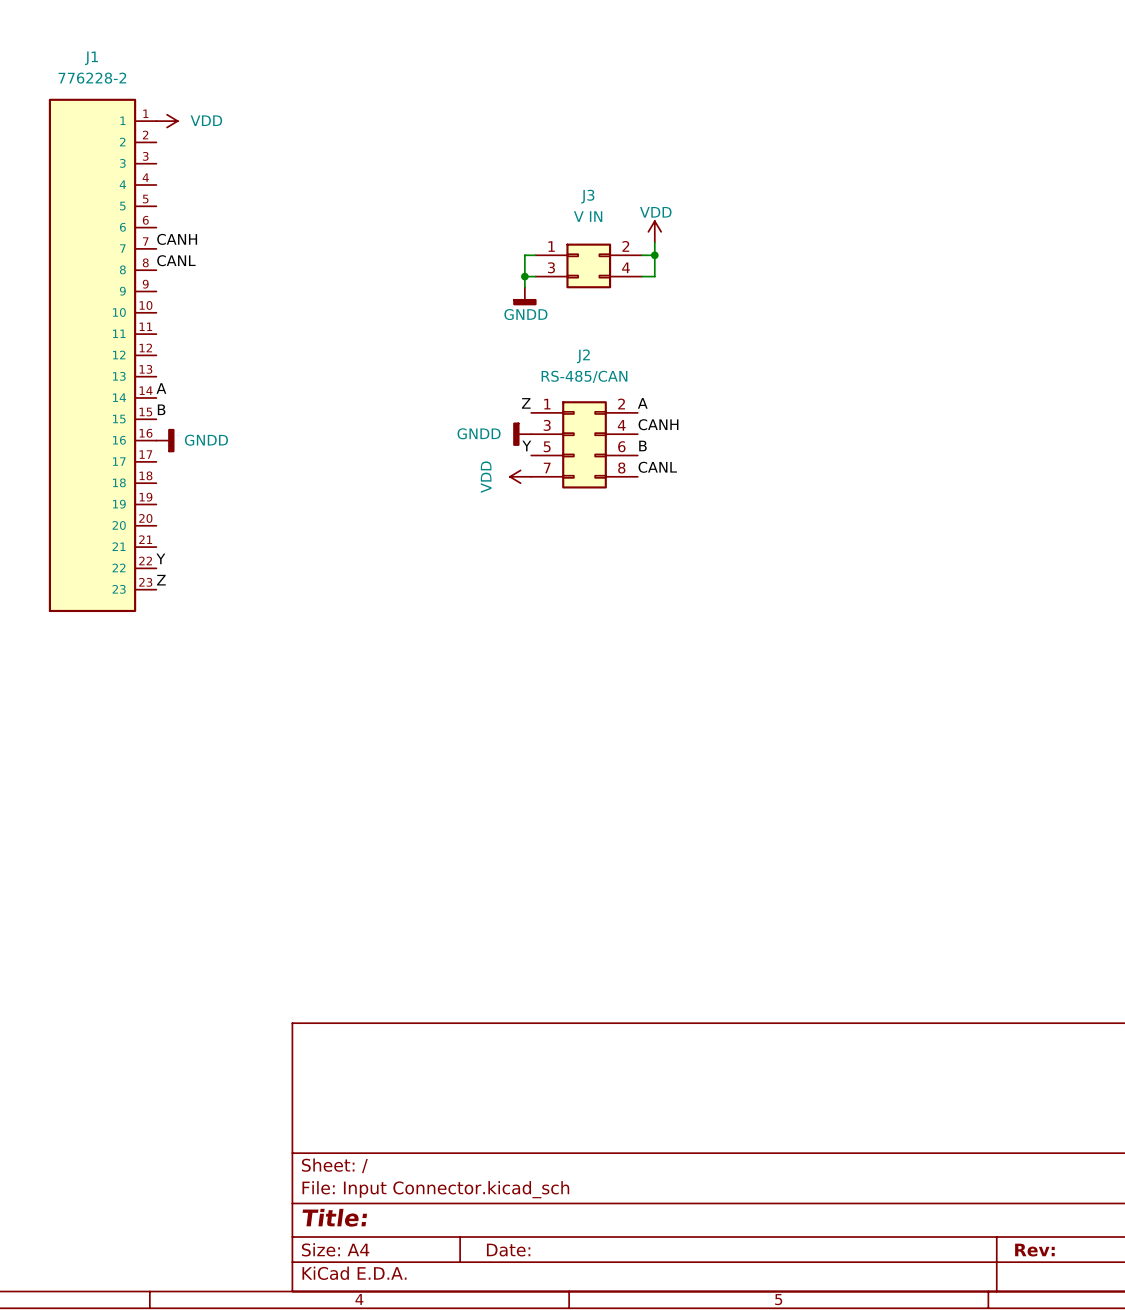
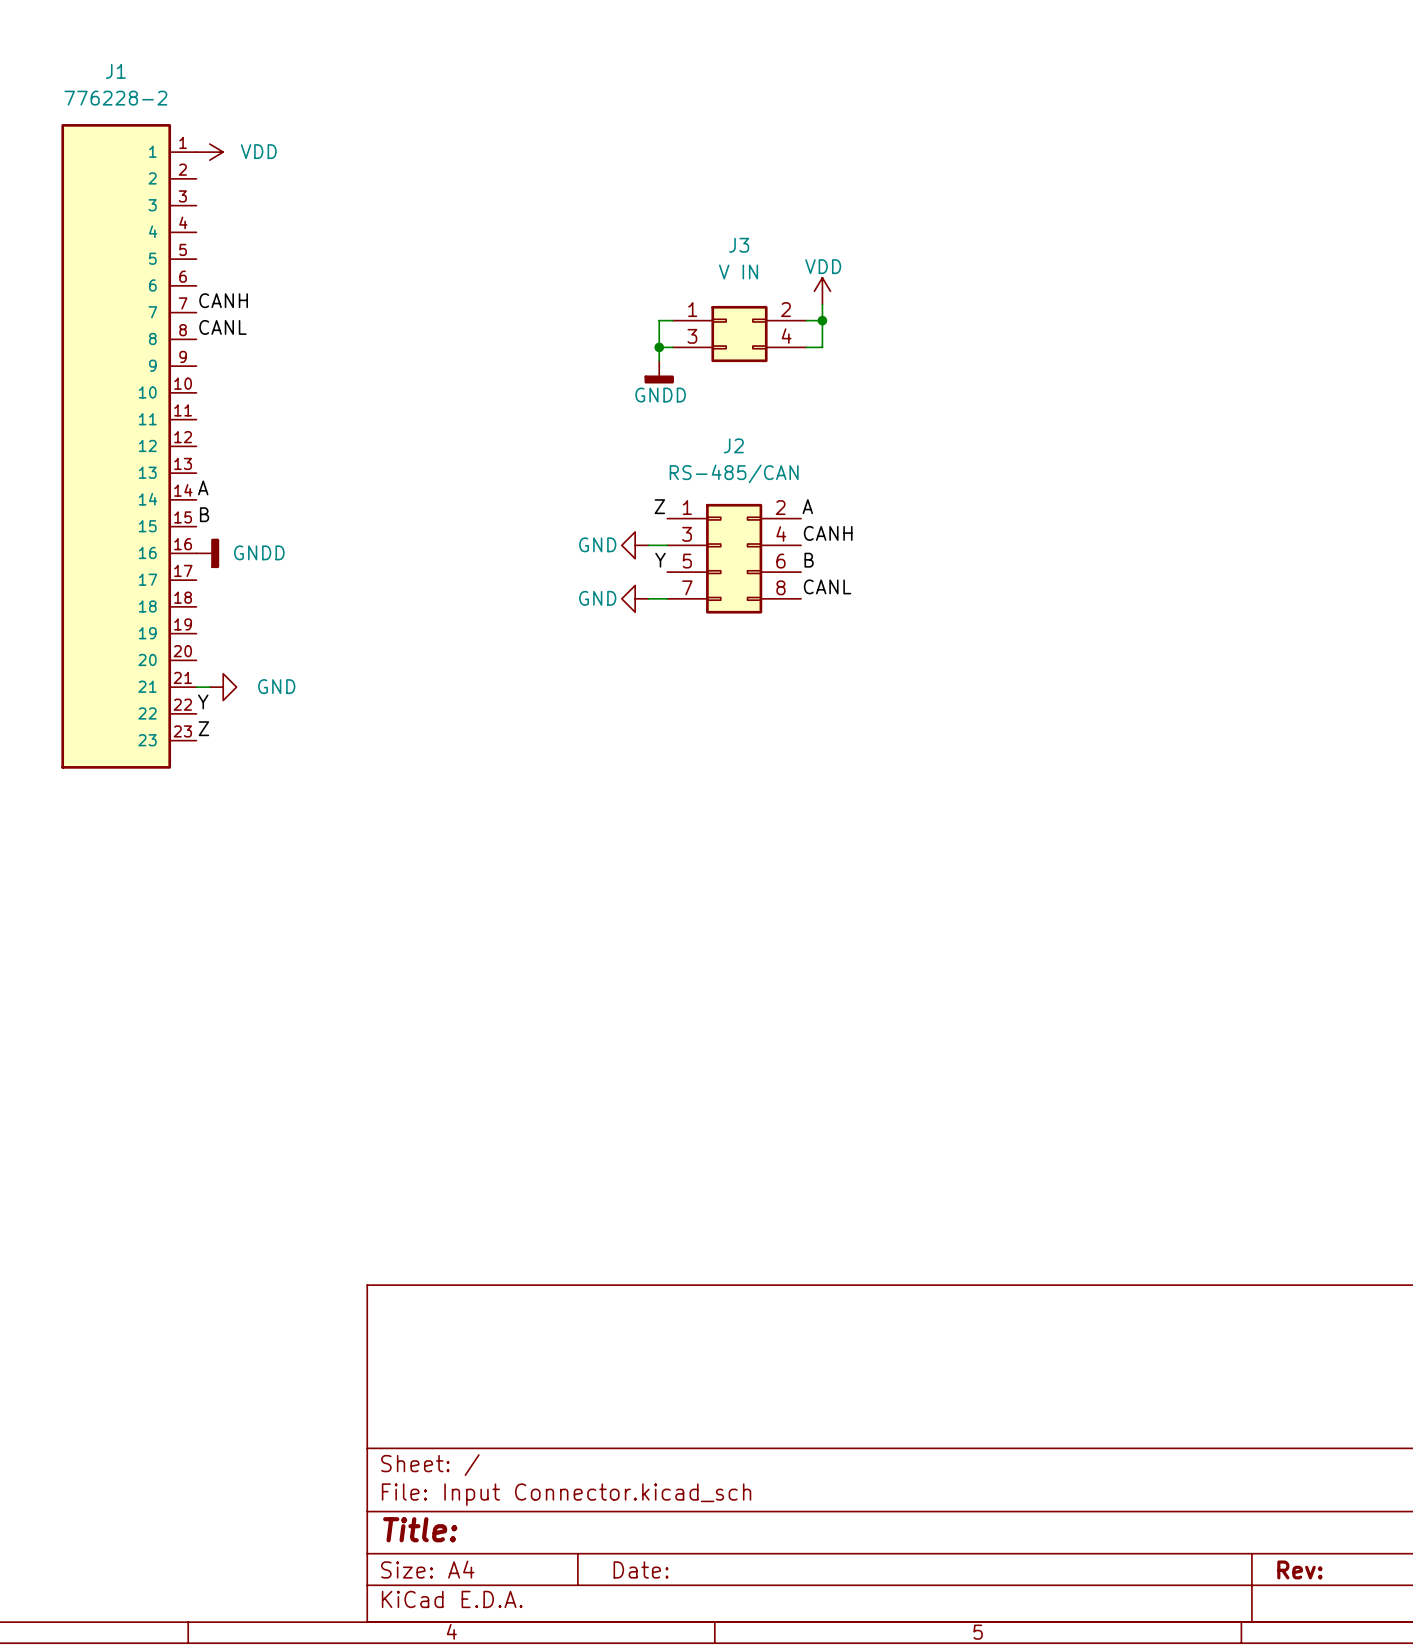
power symbol: none -> GND (635, 545)
power symbol: GNDD (522, 434) -> none
power symbol: none -> GND (635, 598)
power symbol: VDD (520, 476) -> none
wire: none -> (196, 687) (209, 687)
power symbol: none -> GND (223, 687)

